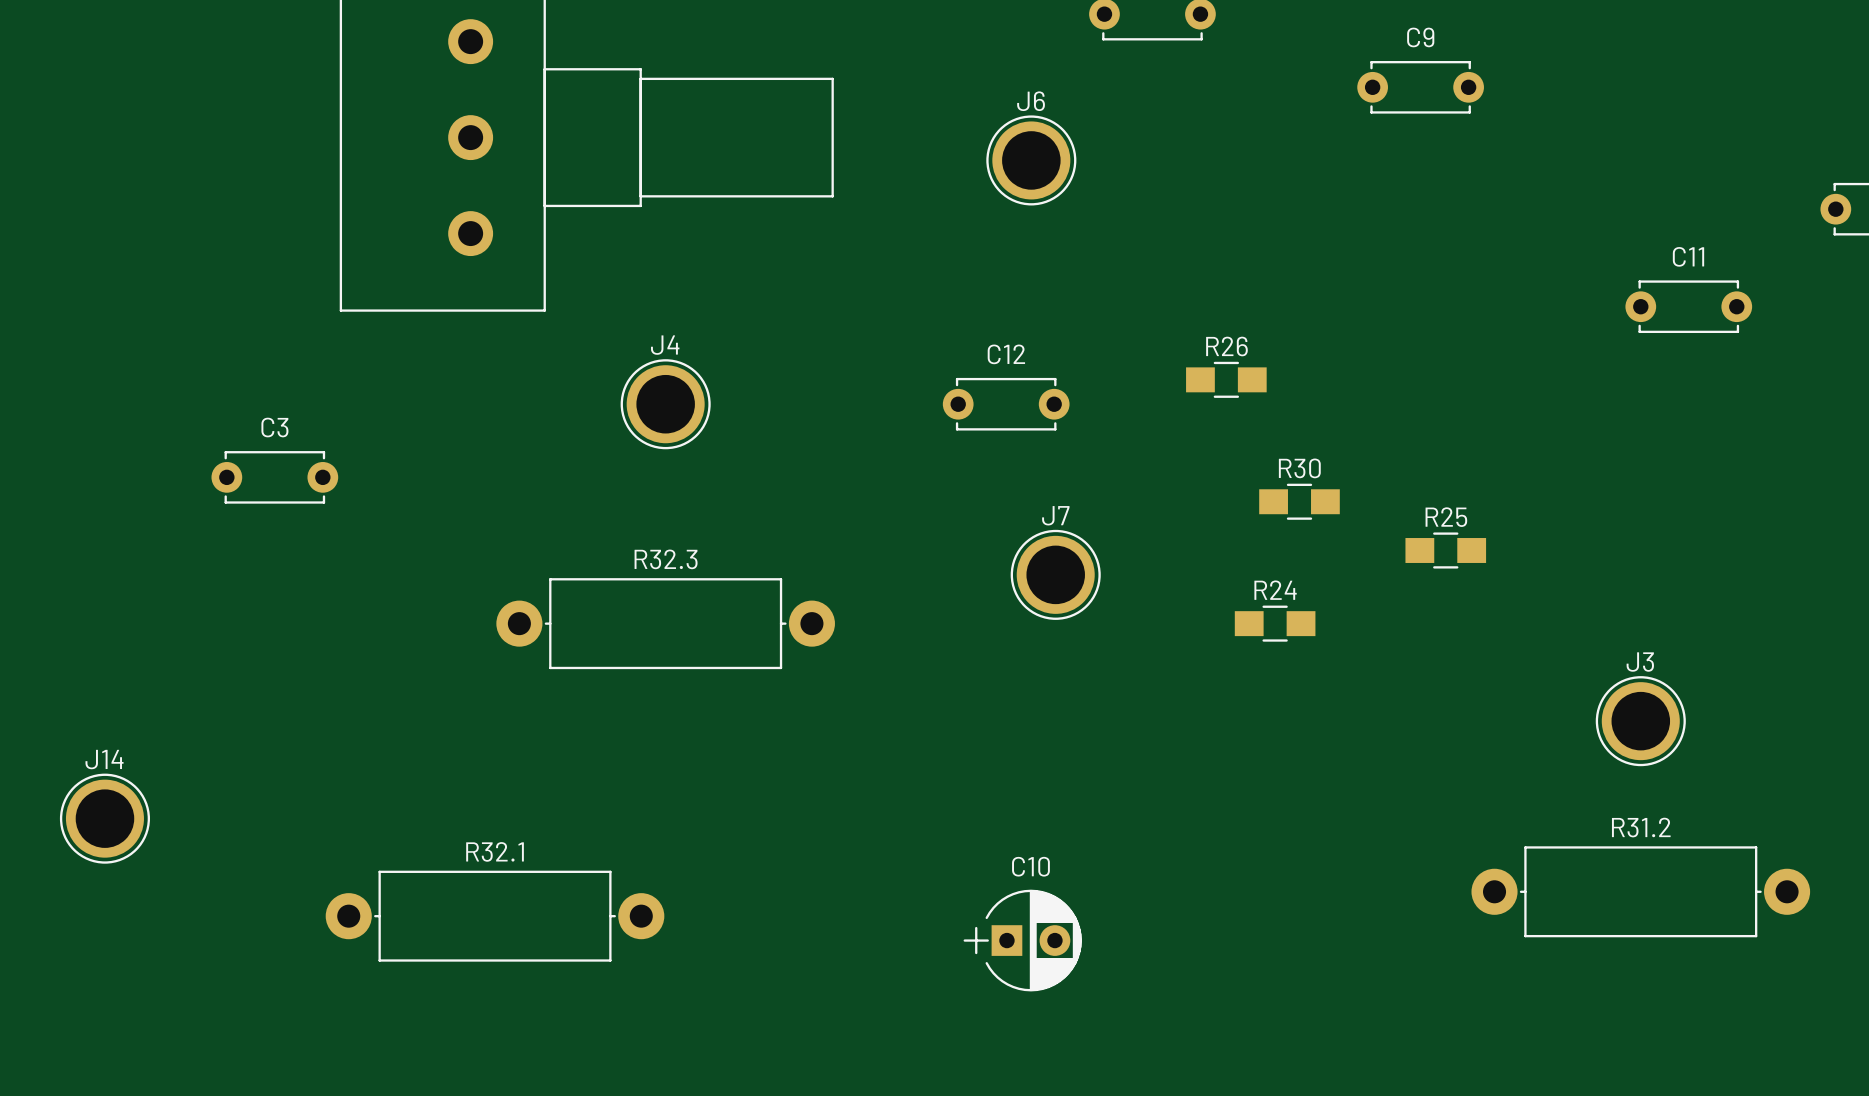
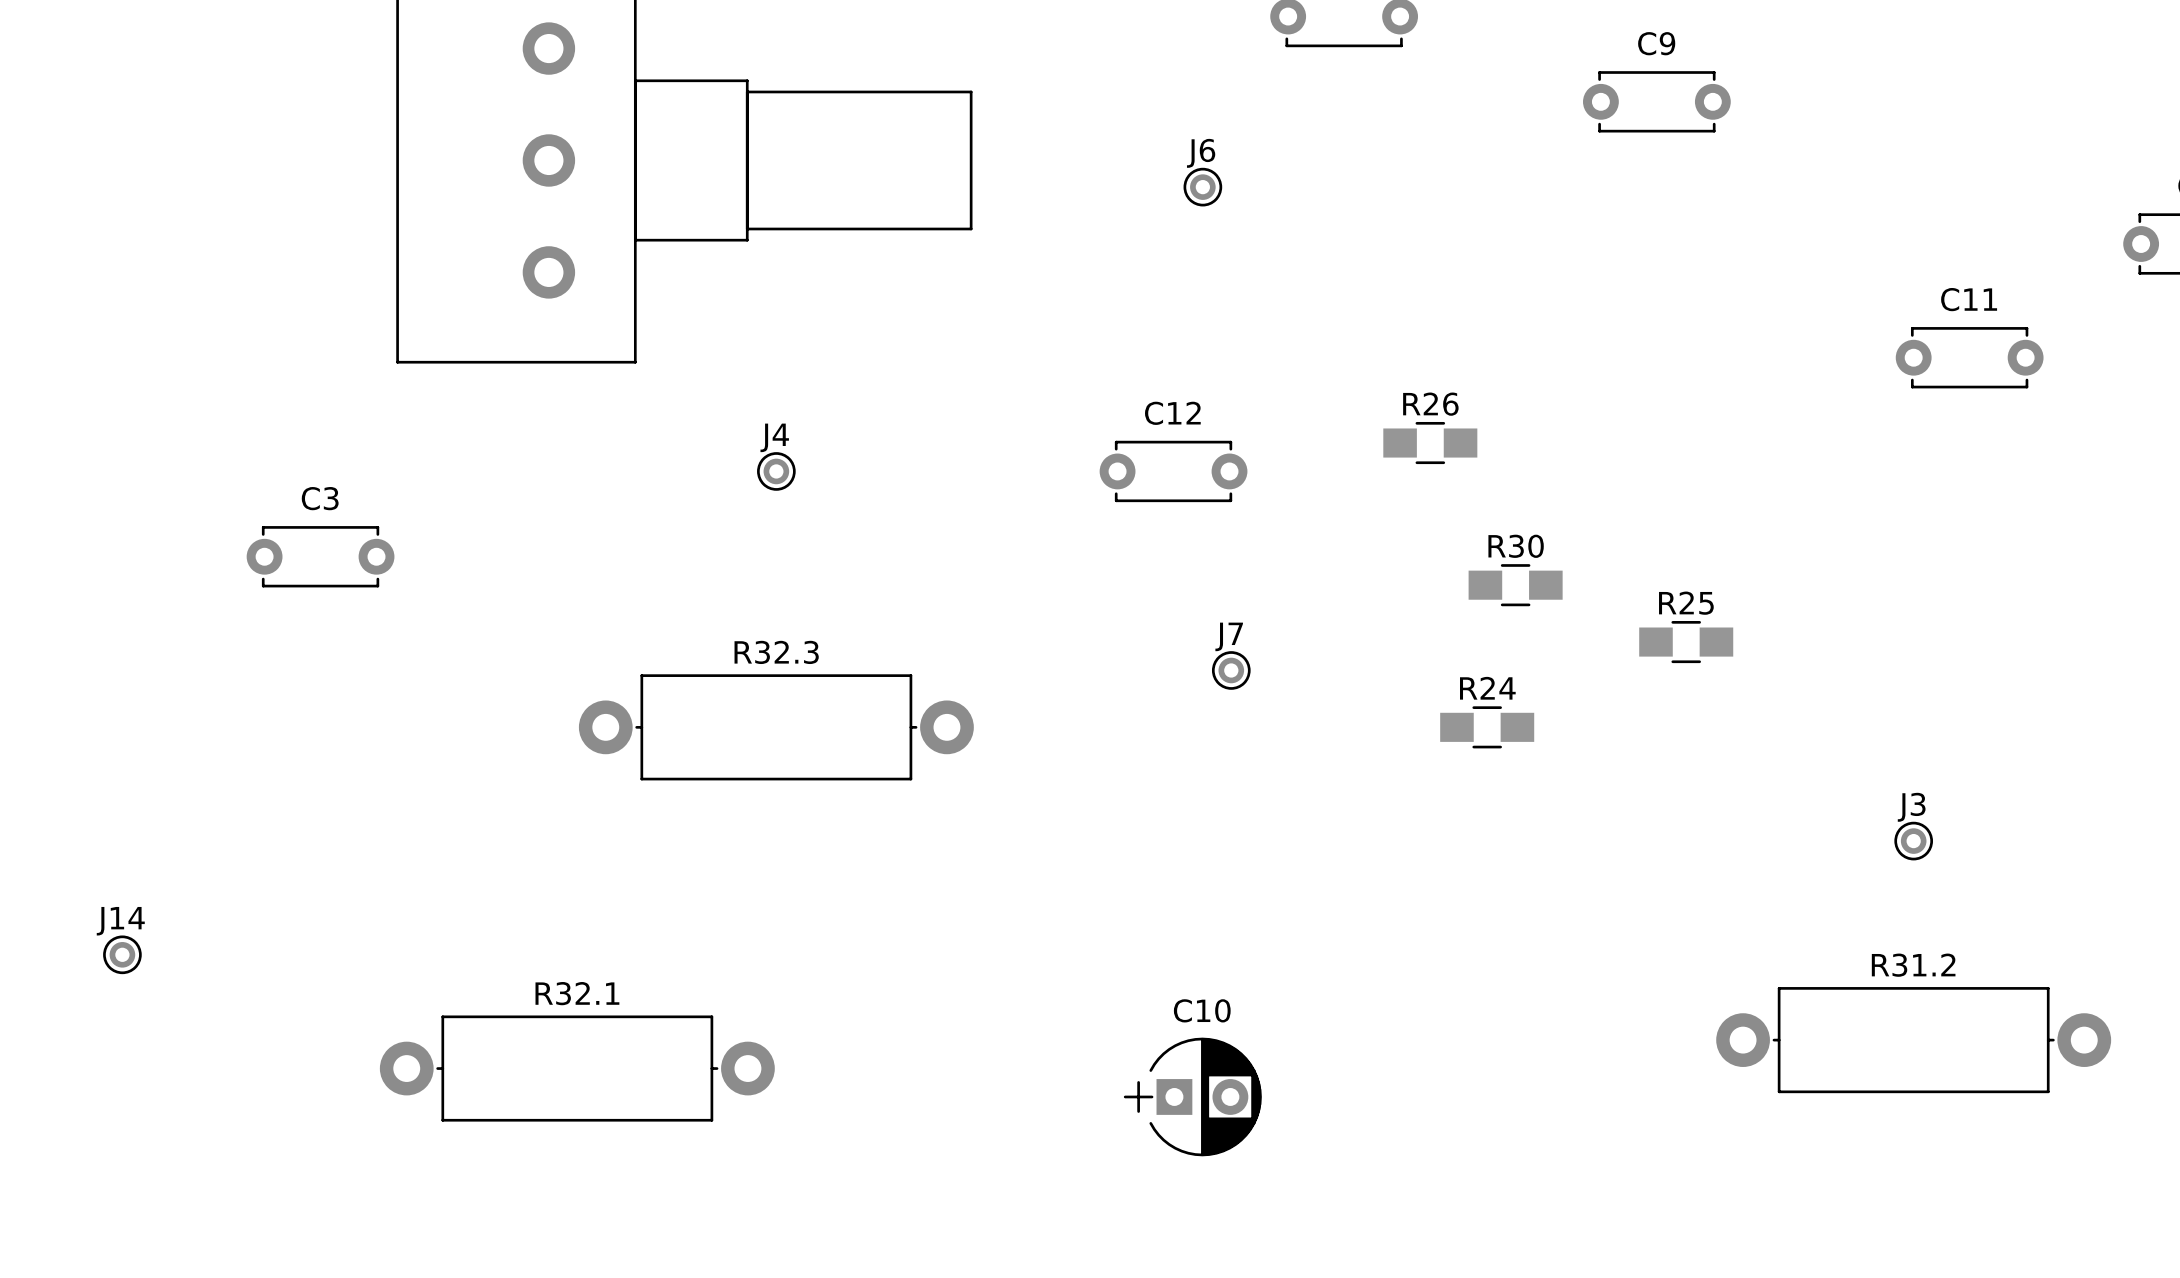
J6 footprint: [986, 115, 1077, 206] -> [1183, 167, 1223, 207]
J4 footprint: [620, 359, 711, 450] -> [757, 452, 796, 491]
J7 footprint: [1010, 529, 1101, 620] -> [1211, 651, 1251, 690]
J3 footprint: [1595, 676, 1686, 767] -> [1894, 821, 1934, 861]
J14 footprint: [59, 773, 150, 864] -> [103, 935, 142, 975]

